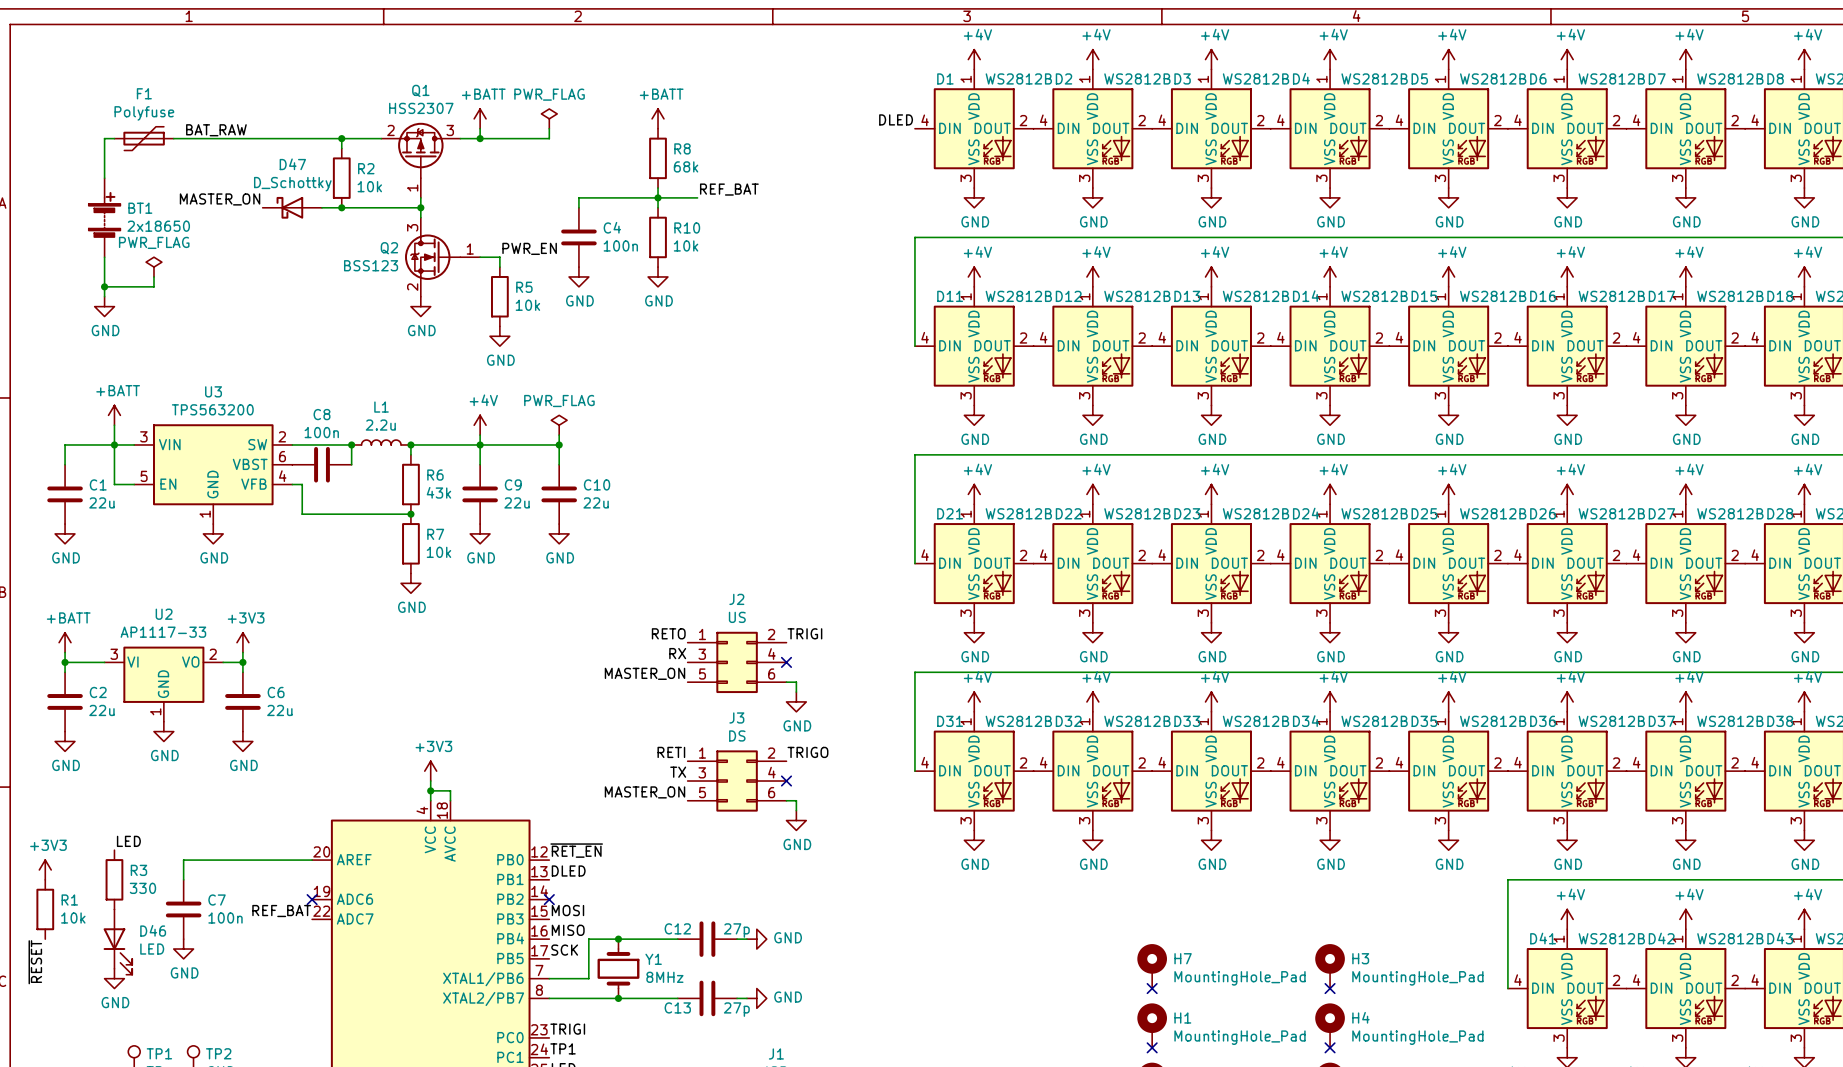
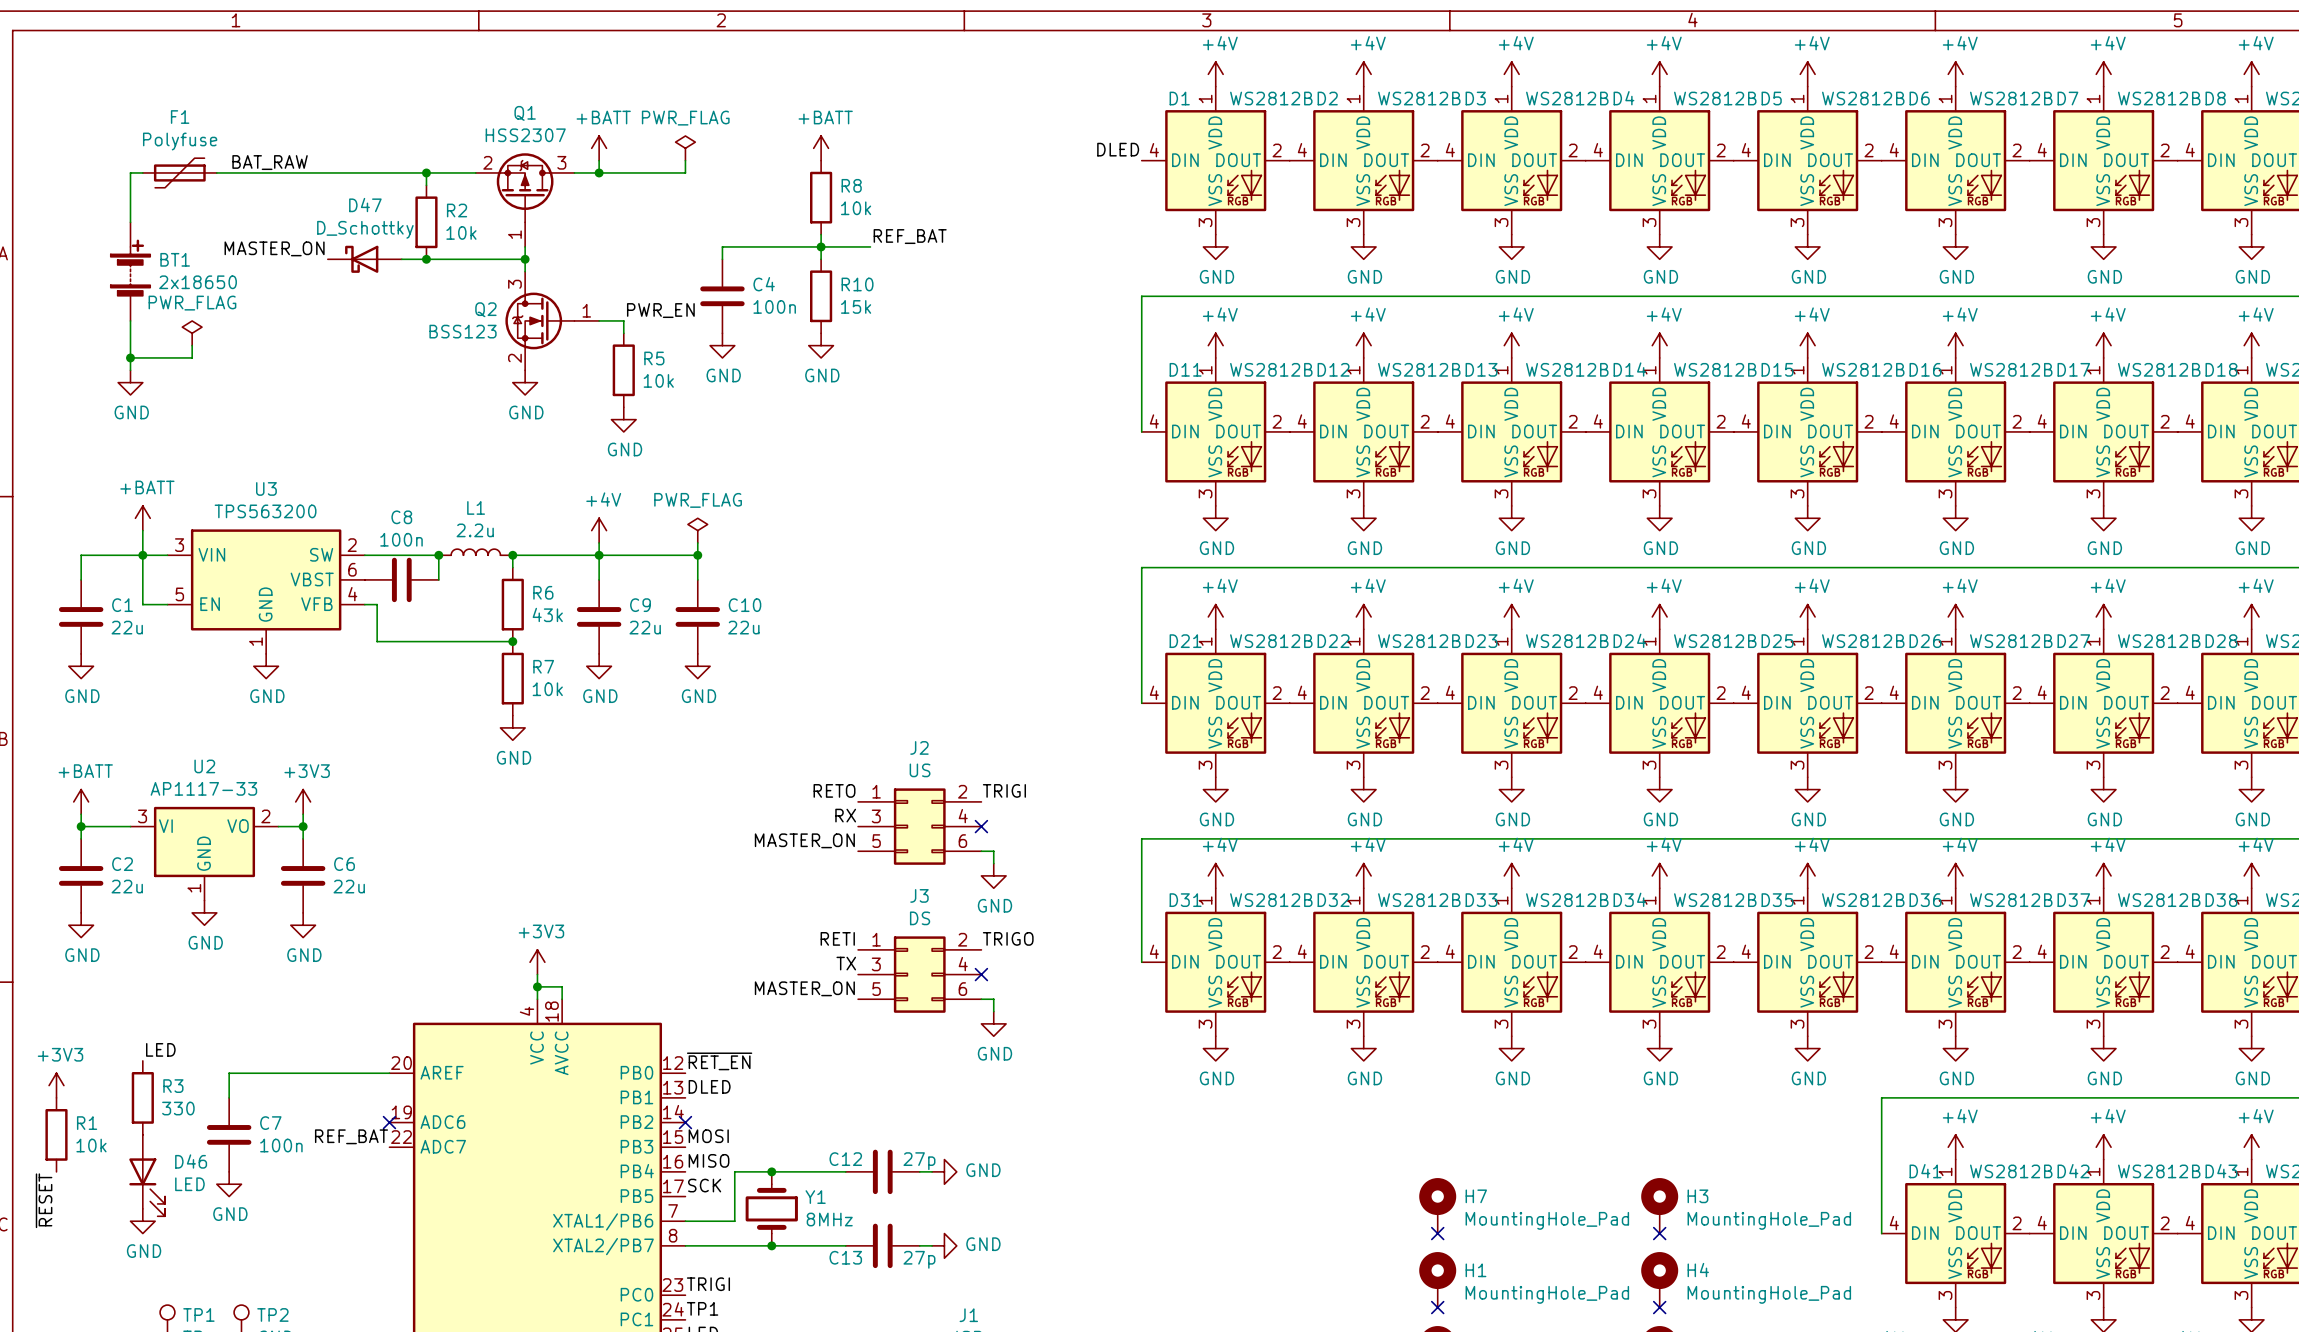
R8 value: 68k (686, 166) -> 10k (856, 208)
R10 value: 10k (686, 245) -> 15k (856, 306)

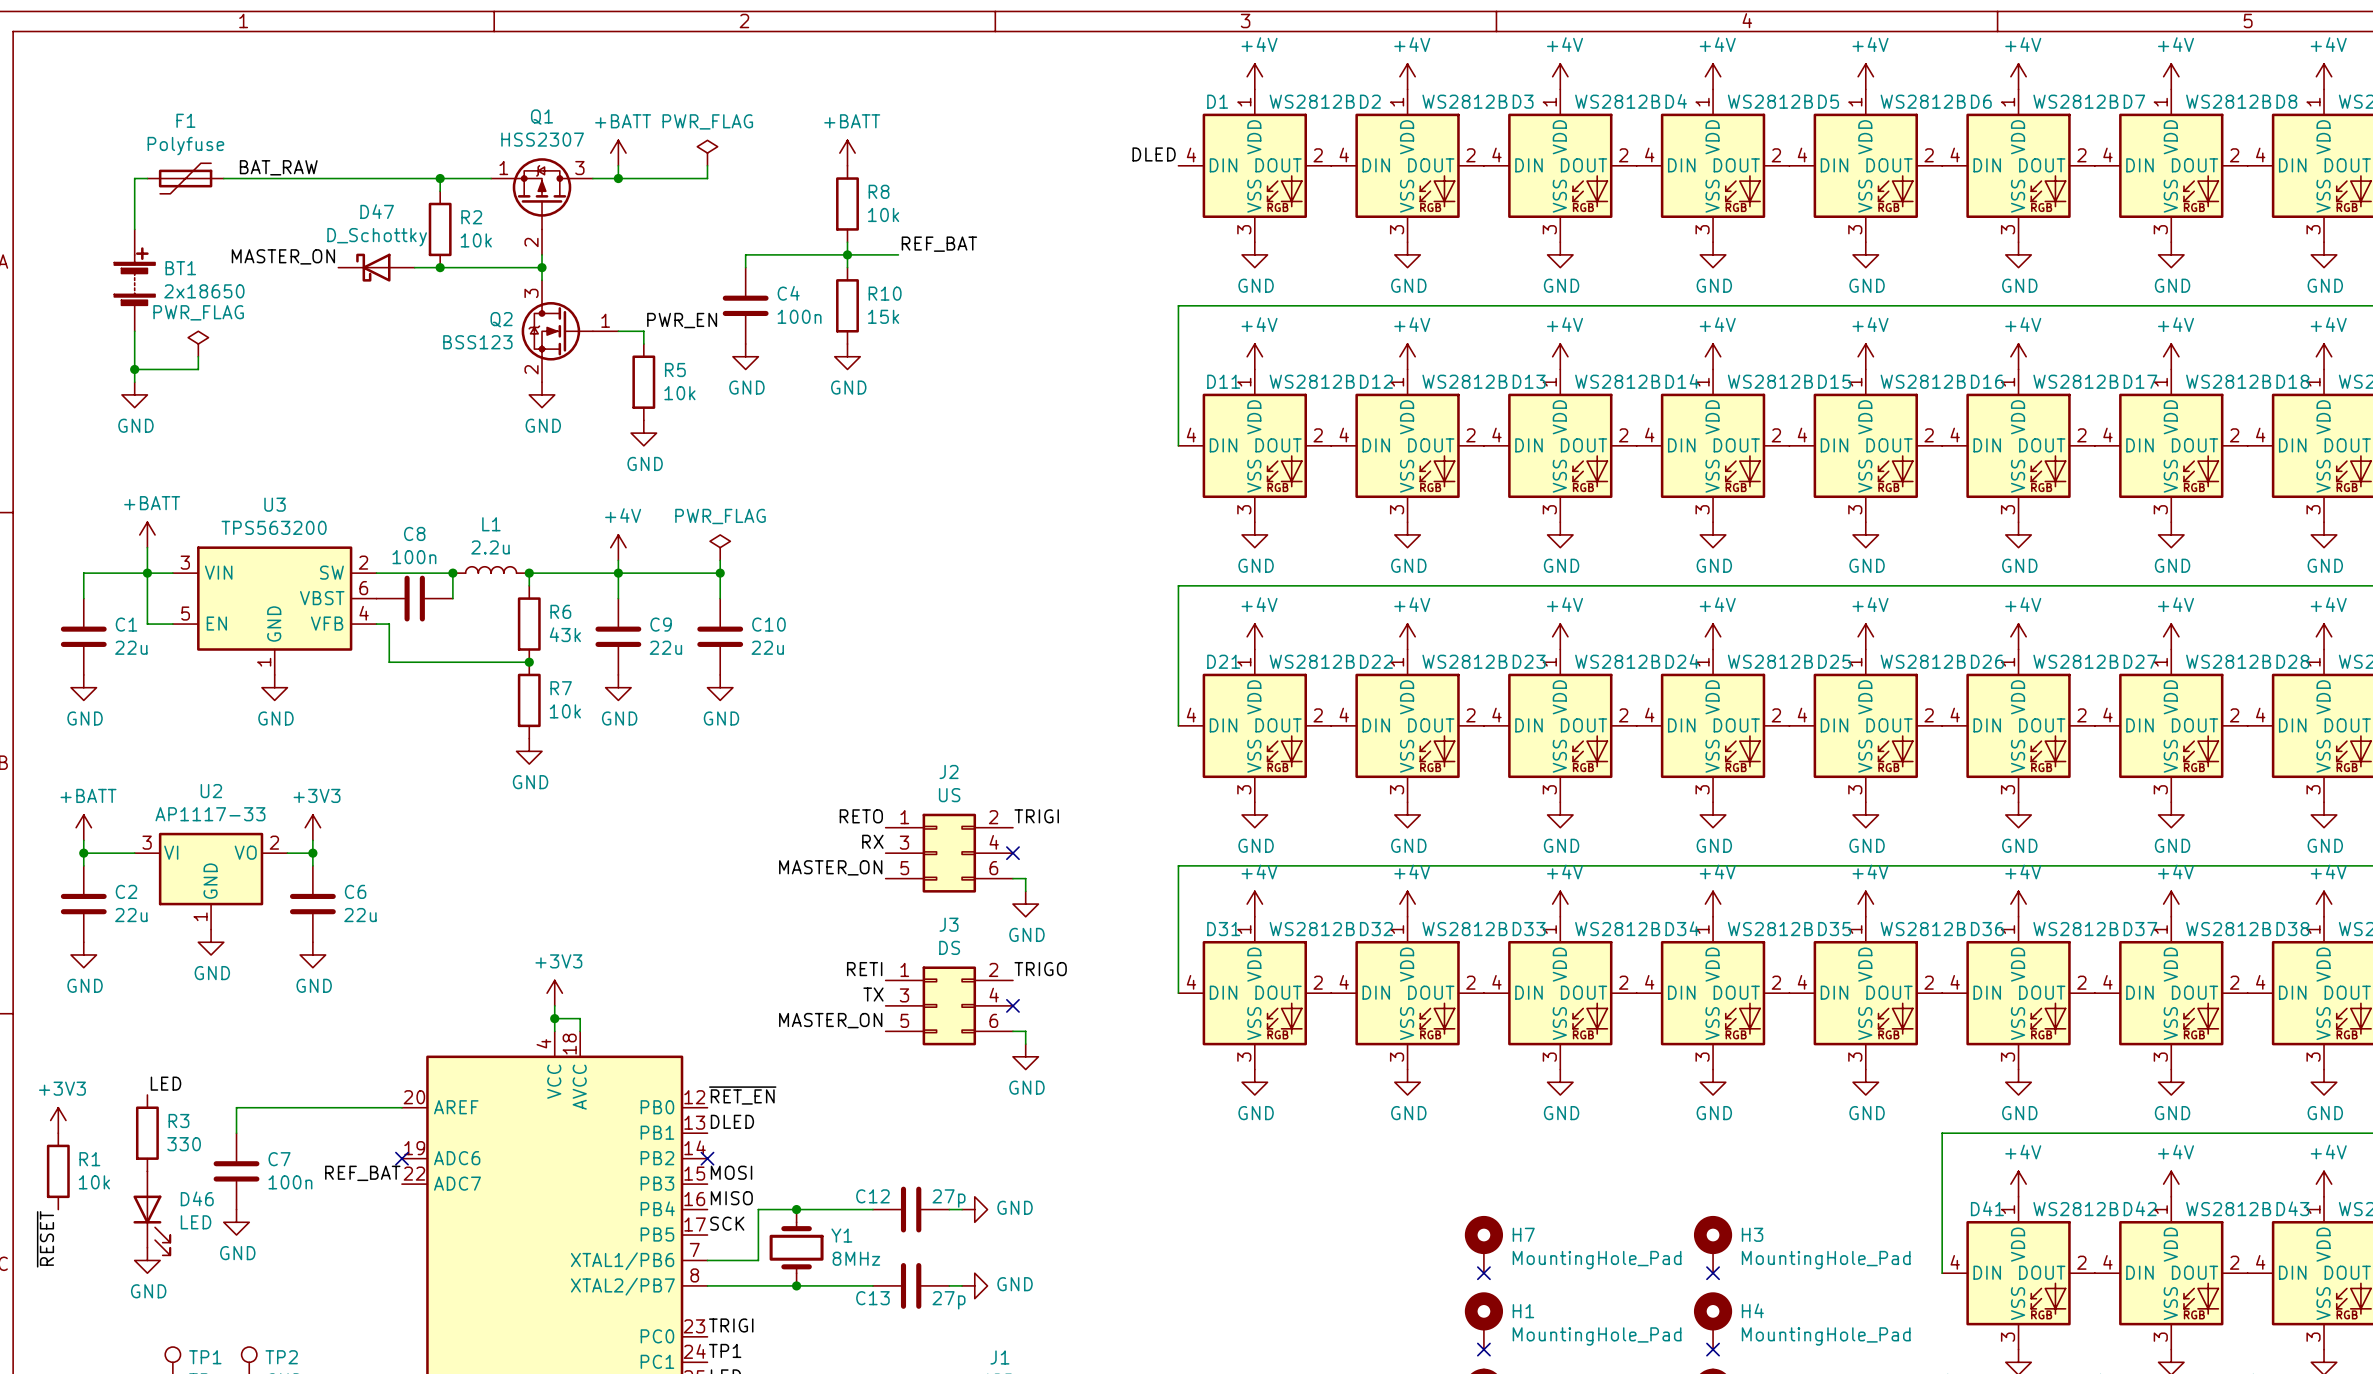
Q1 pin number: 2 (487, 162) -> 1 (503, 168)
Q1 pin number: 1 (514, 234) -> 2 (531, 242)

